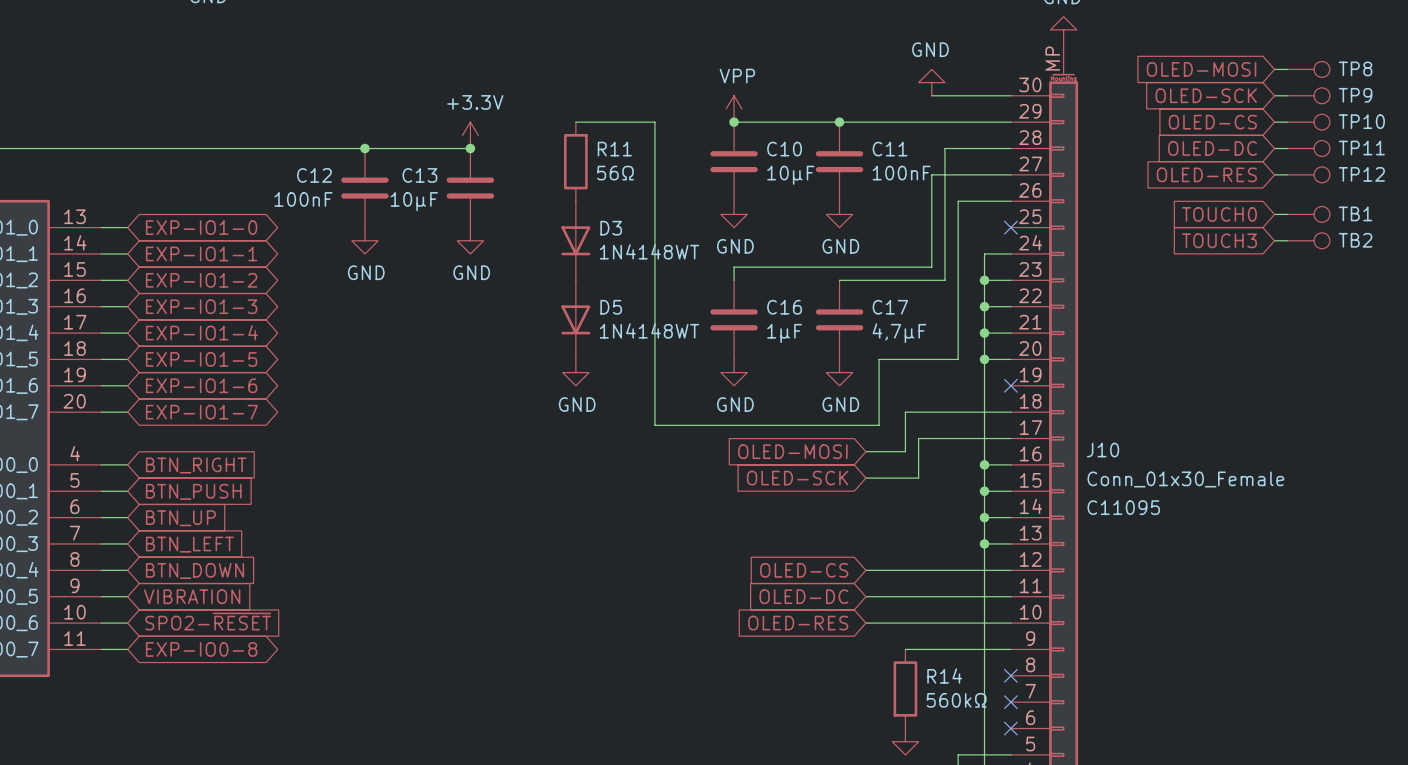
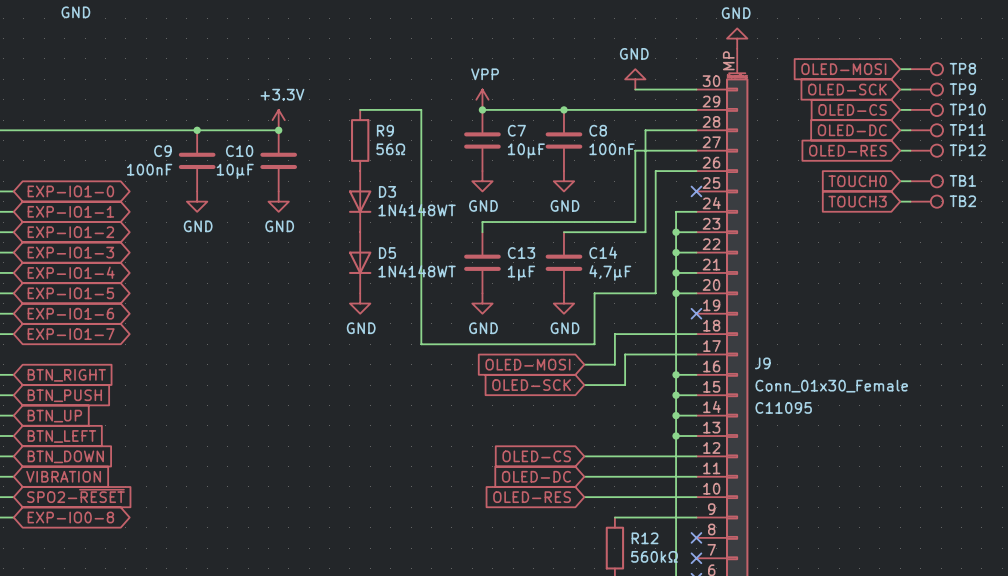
R11 name: R11 (614, 149) -> R9 (385, 130)
C10 name: C10 (784, 149) -> C7 (516, 130)
C11 name: C11 (890, 149) -> C8 (598, 130)
C12 name: C12 (314, 175) -> C9 (162, 151)
C13 name: C13 (419, 175) -> C10 (239, 151)
C16 name: C16 (784, 307) -> C13 (521, 253)
C17 name: C17 (890, 307) -> C14 (603, 252)
J10 name: J10 (1103, 450) -> J9 (762, 363)
R14 name: R14 (944, 676) -> R12 (645, 538)

